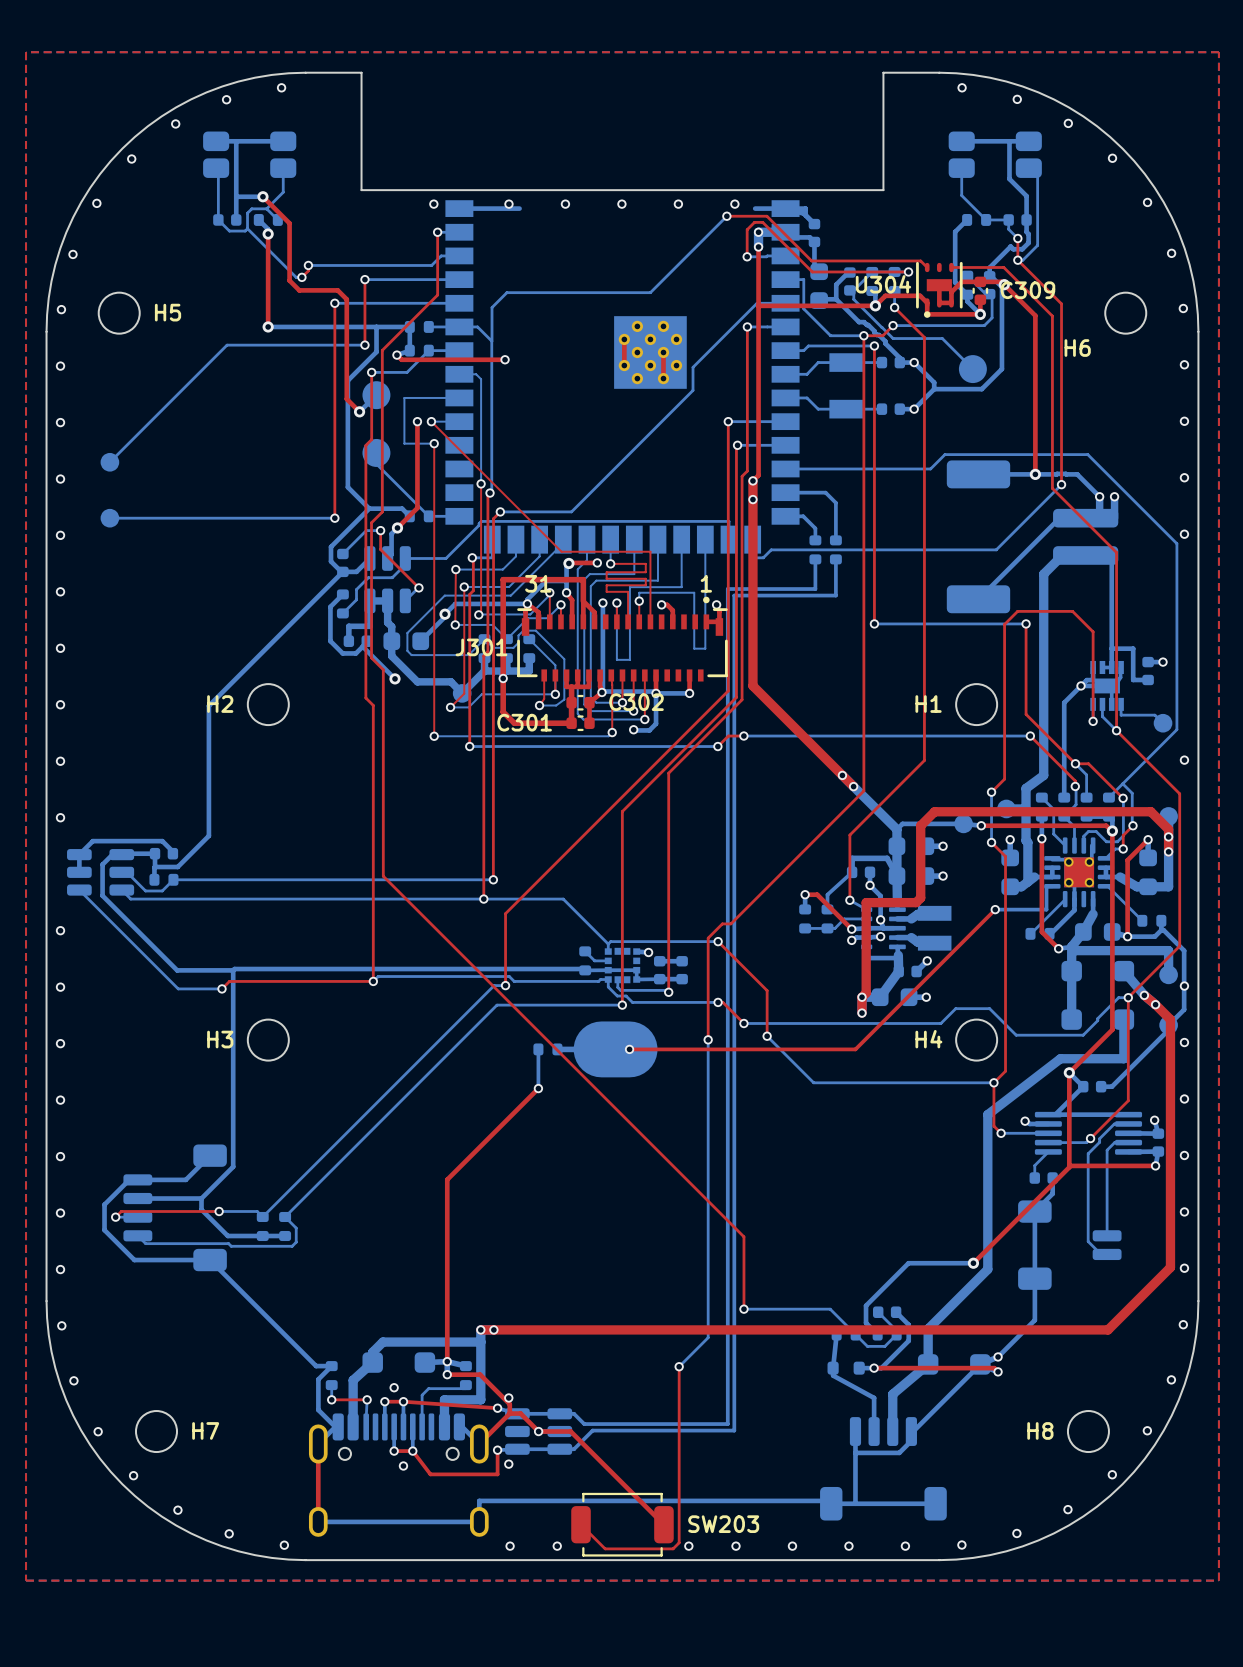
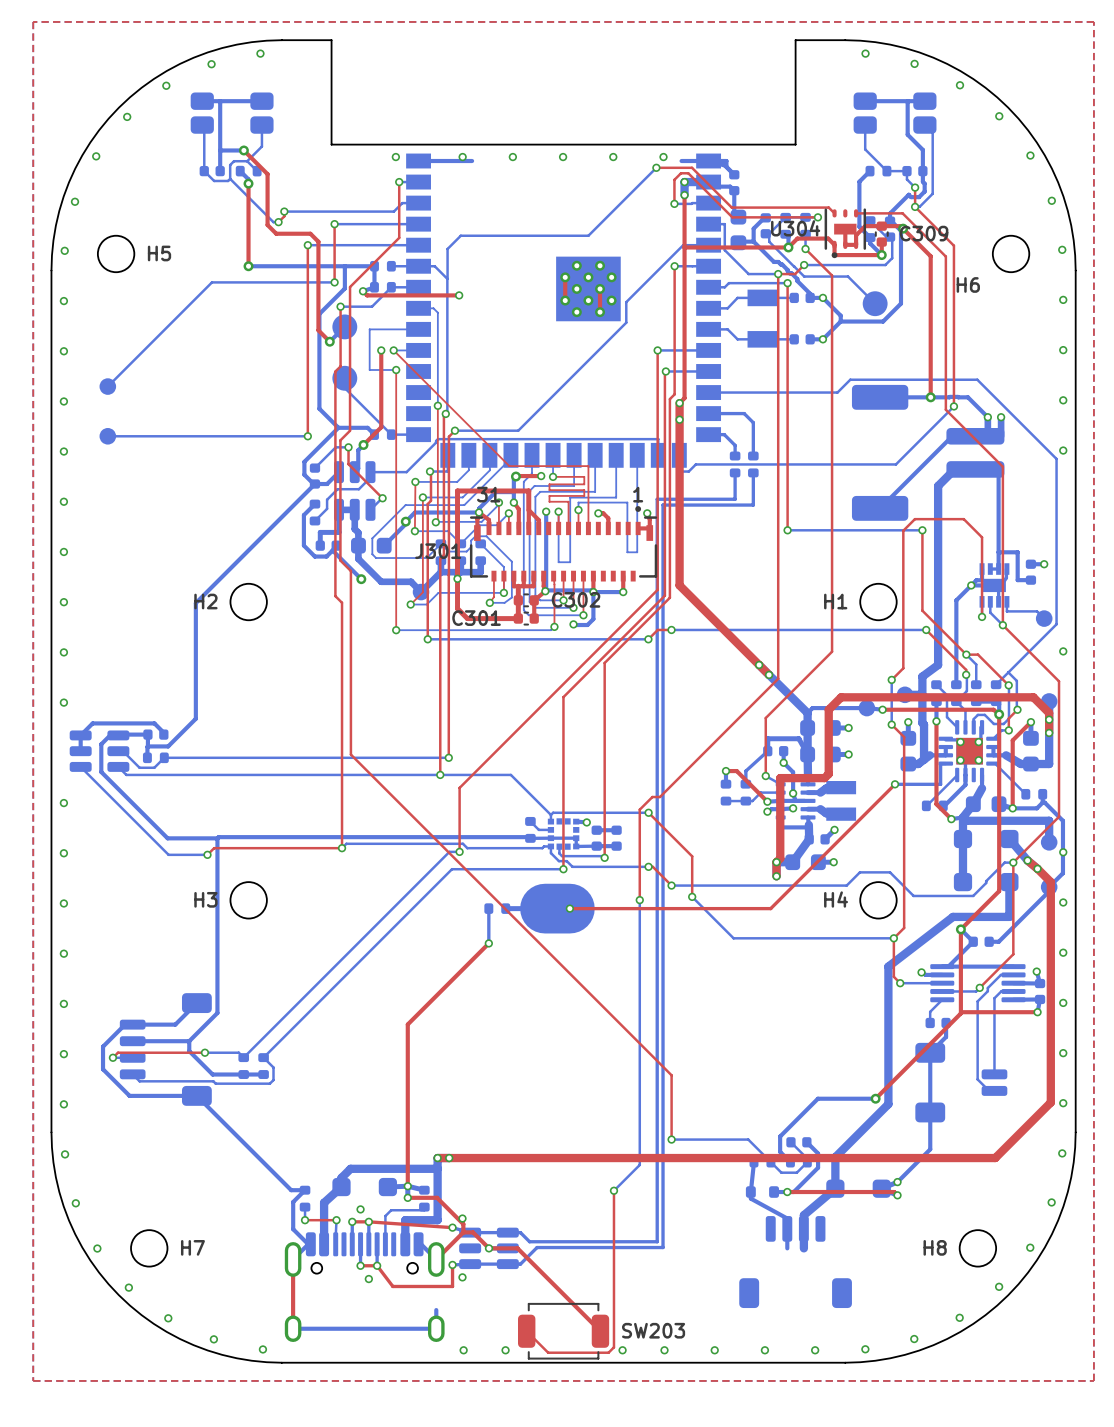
bottom track: (980, 1364) (911, 1431) (911, 1440) (899, 1452) (855, 1452) -> none
bottom track: (855, 1431) (855, 1503) -> none
part position: (883, 1468) -> (795, 1262)
bottom track: (479, 1500) (828, 1500) (831, 1503) (935, 1503) -> none

